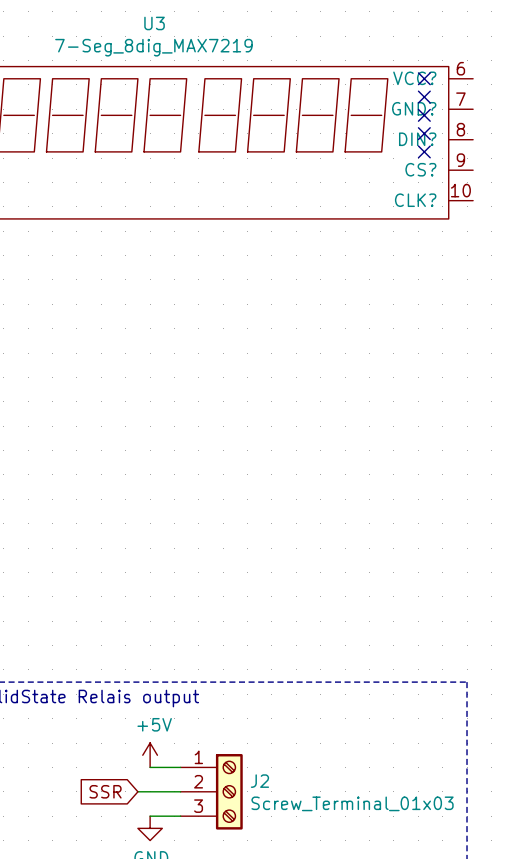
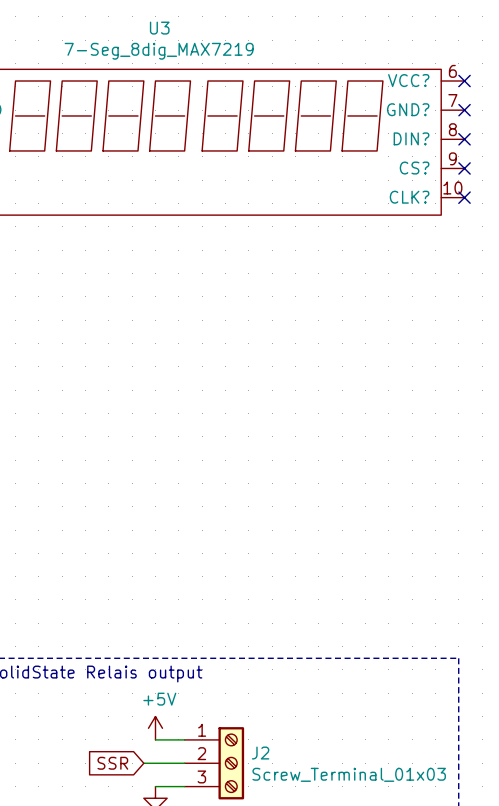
no-connect mark: (424, 78) -> none
no-connect mark: none -> (464, 81)
no-connect mark: (424, 97) -> none
no-connect mark: none -> (464, 110)
no-connect mark: (424, 115) -> none
no-connect mark: (424, 133) -> none
no-connect mark: none -> (464, 139)
no-connect mark: (424, 151) -> none
no-connect mark: none -> (464, 168)
no-connect mark: none -> (464, 197)

